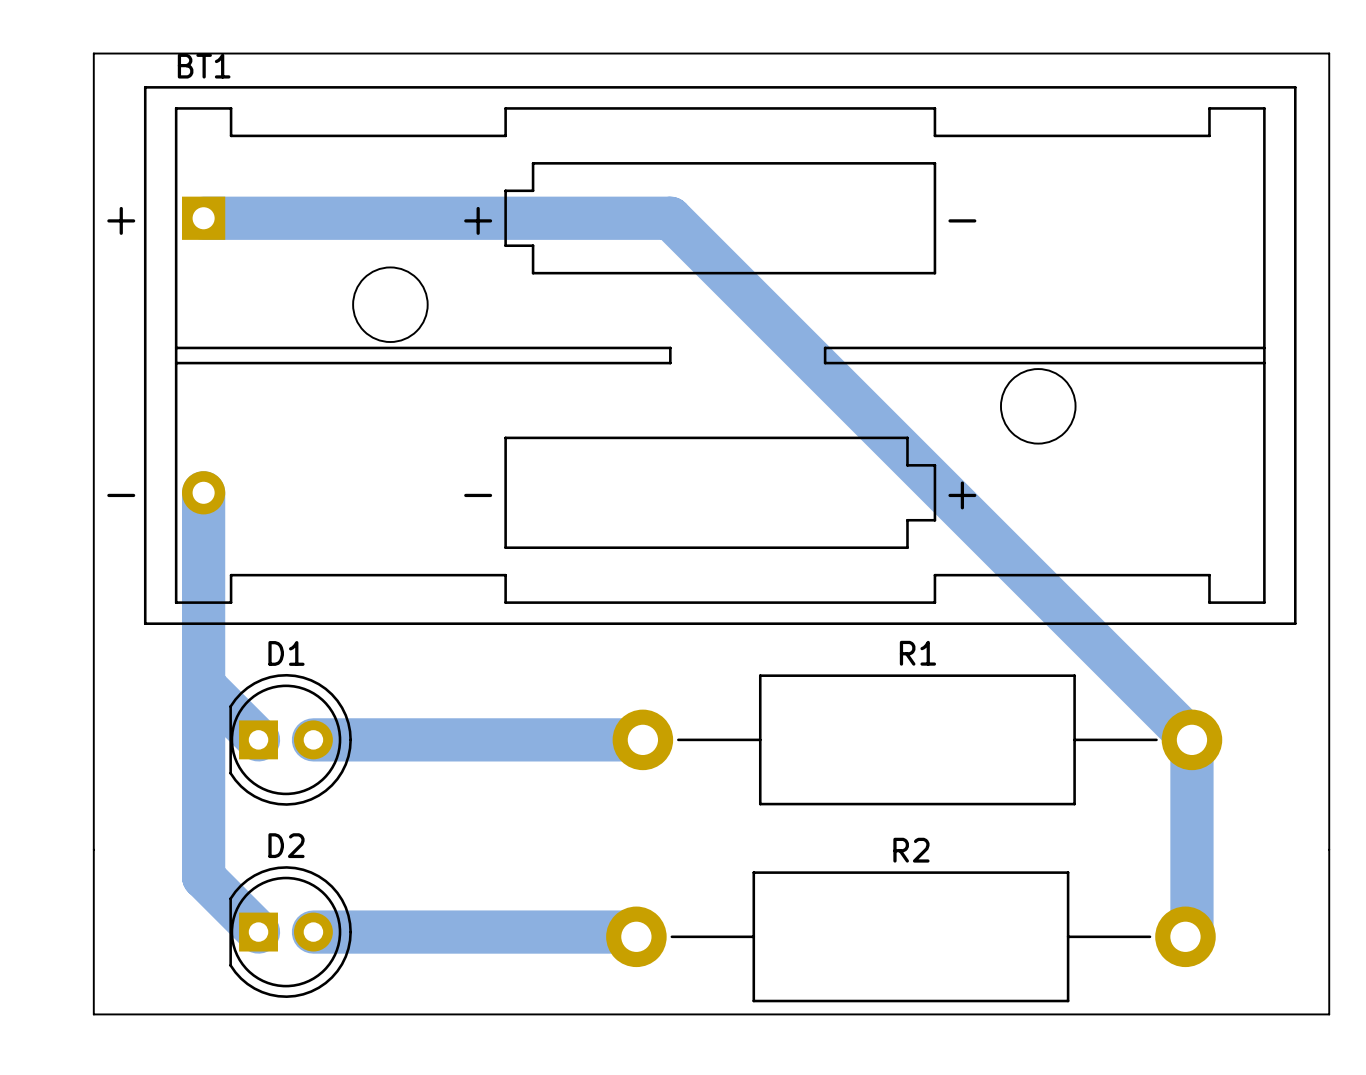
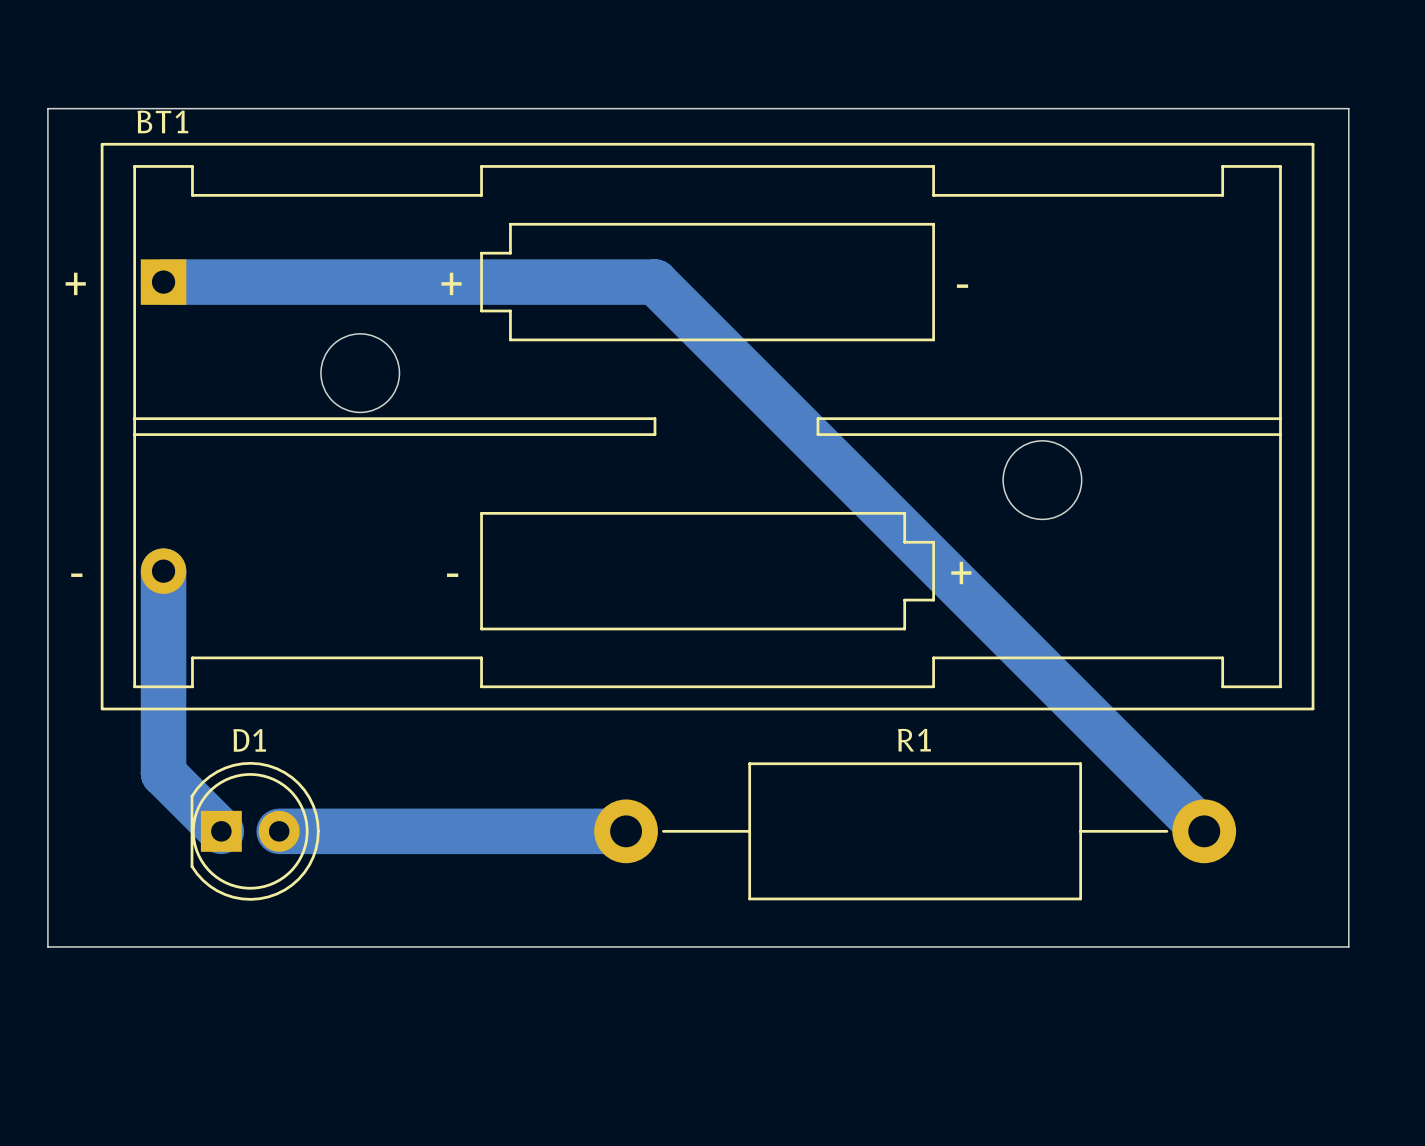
bottom track: (203, 684) (203, 877) (258, 932) -> none
bottom track: (1191, 739) (1191, 930) (1185, 936) -> none
board edge: (93, 849) (93, 1014) (1329, 1014) (1329, 849) -> (47, 946) (1348, 946)
D2: (290, 932) -> none
bottom track: (313, 932) (631, 932) (636, 936) -> none
R2: (910, 936) -> none

